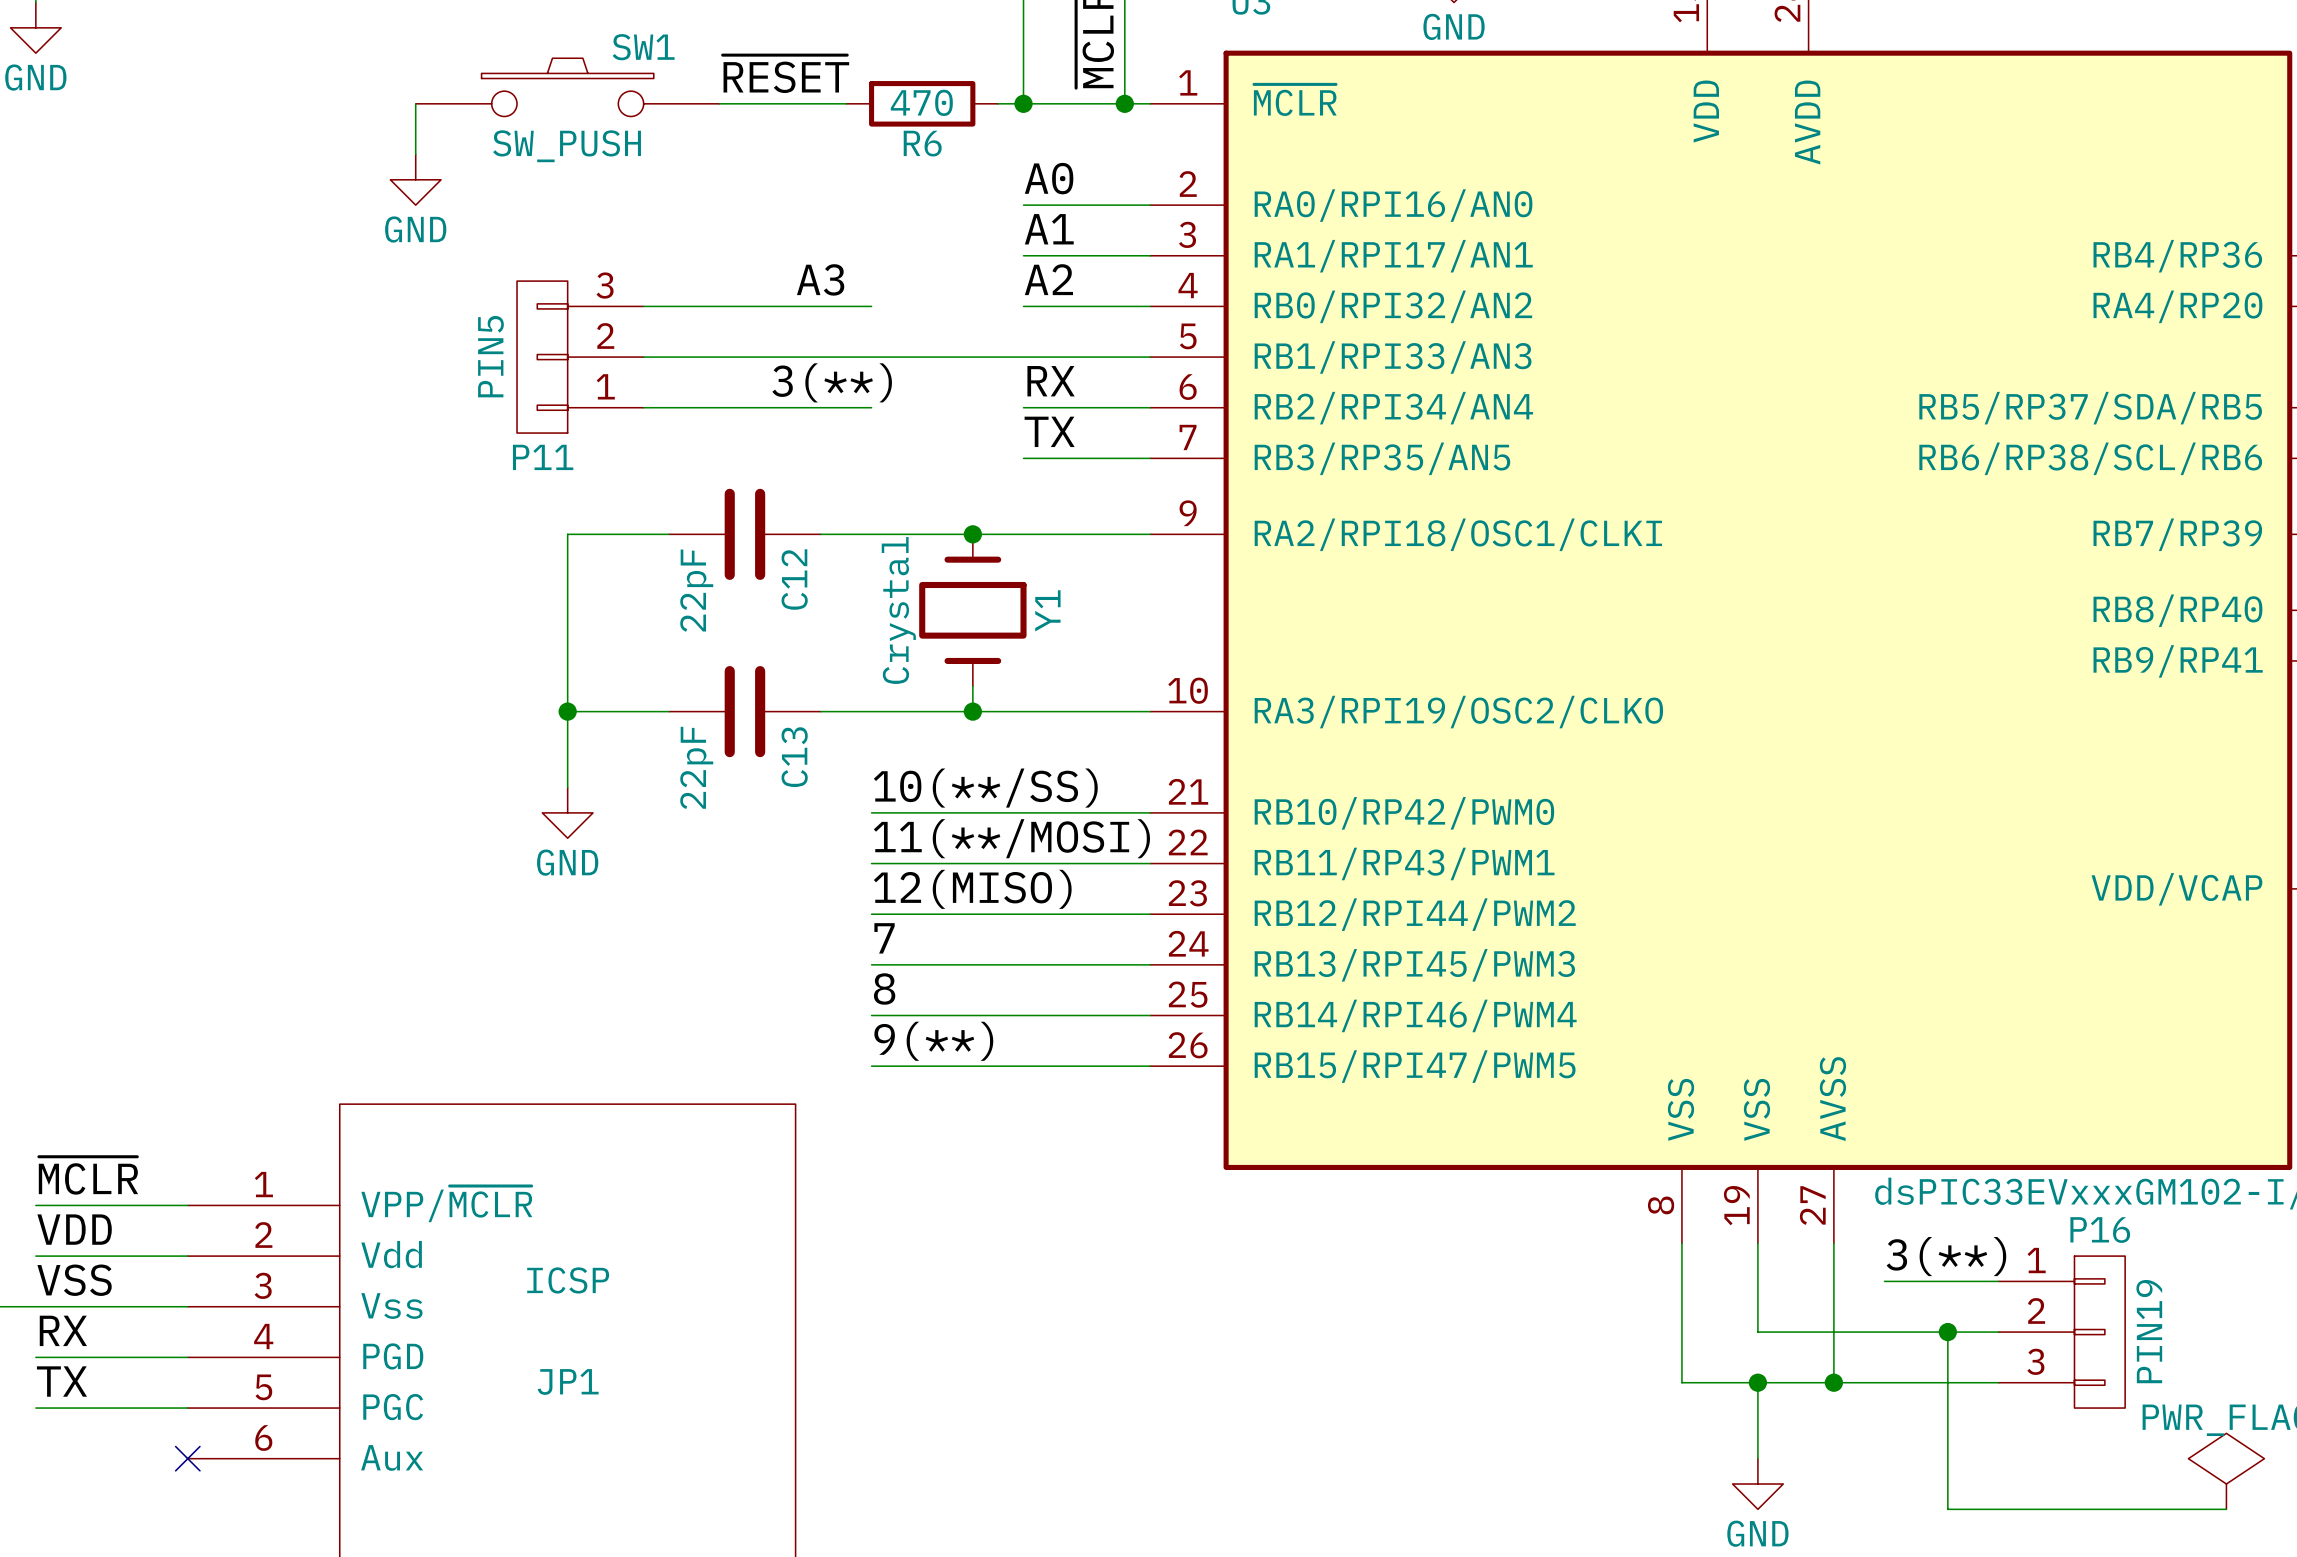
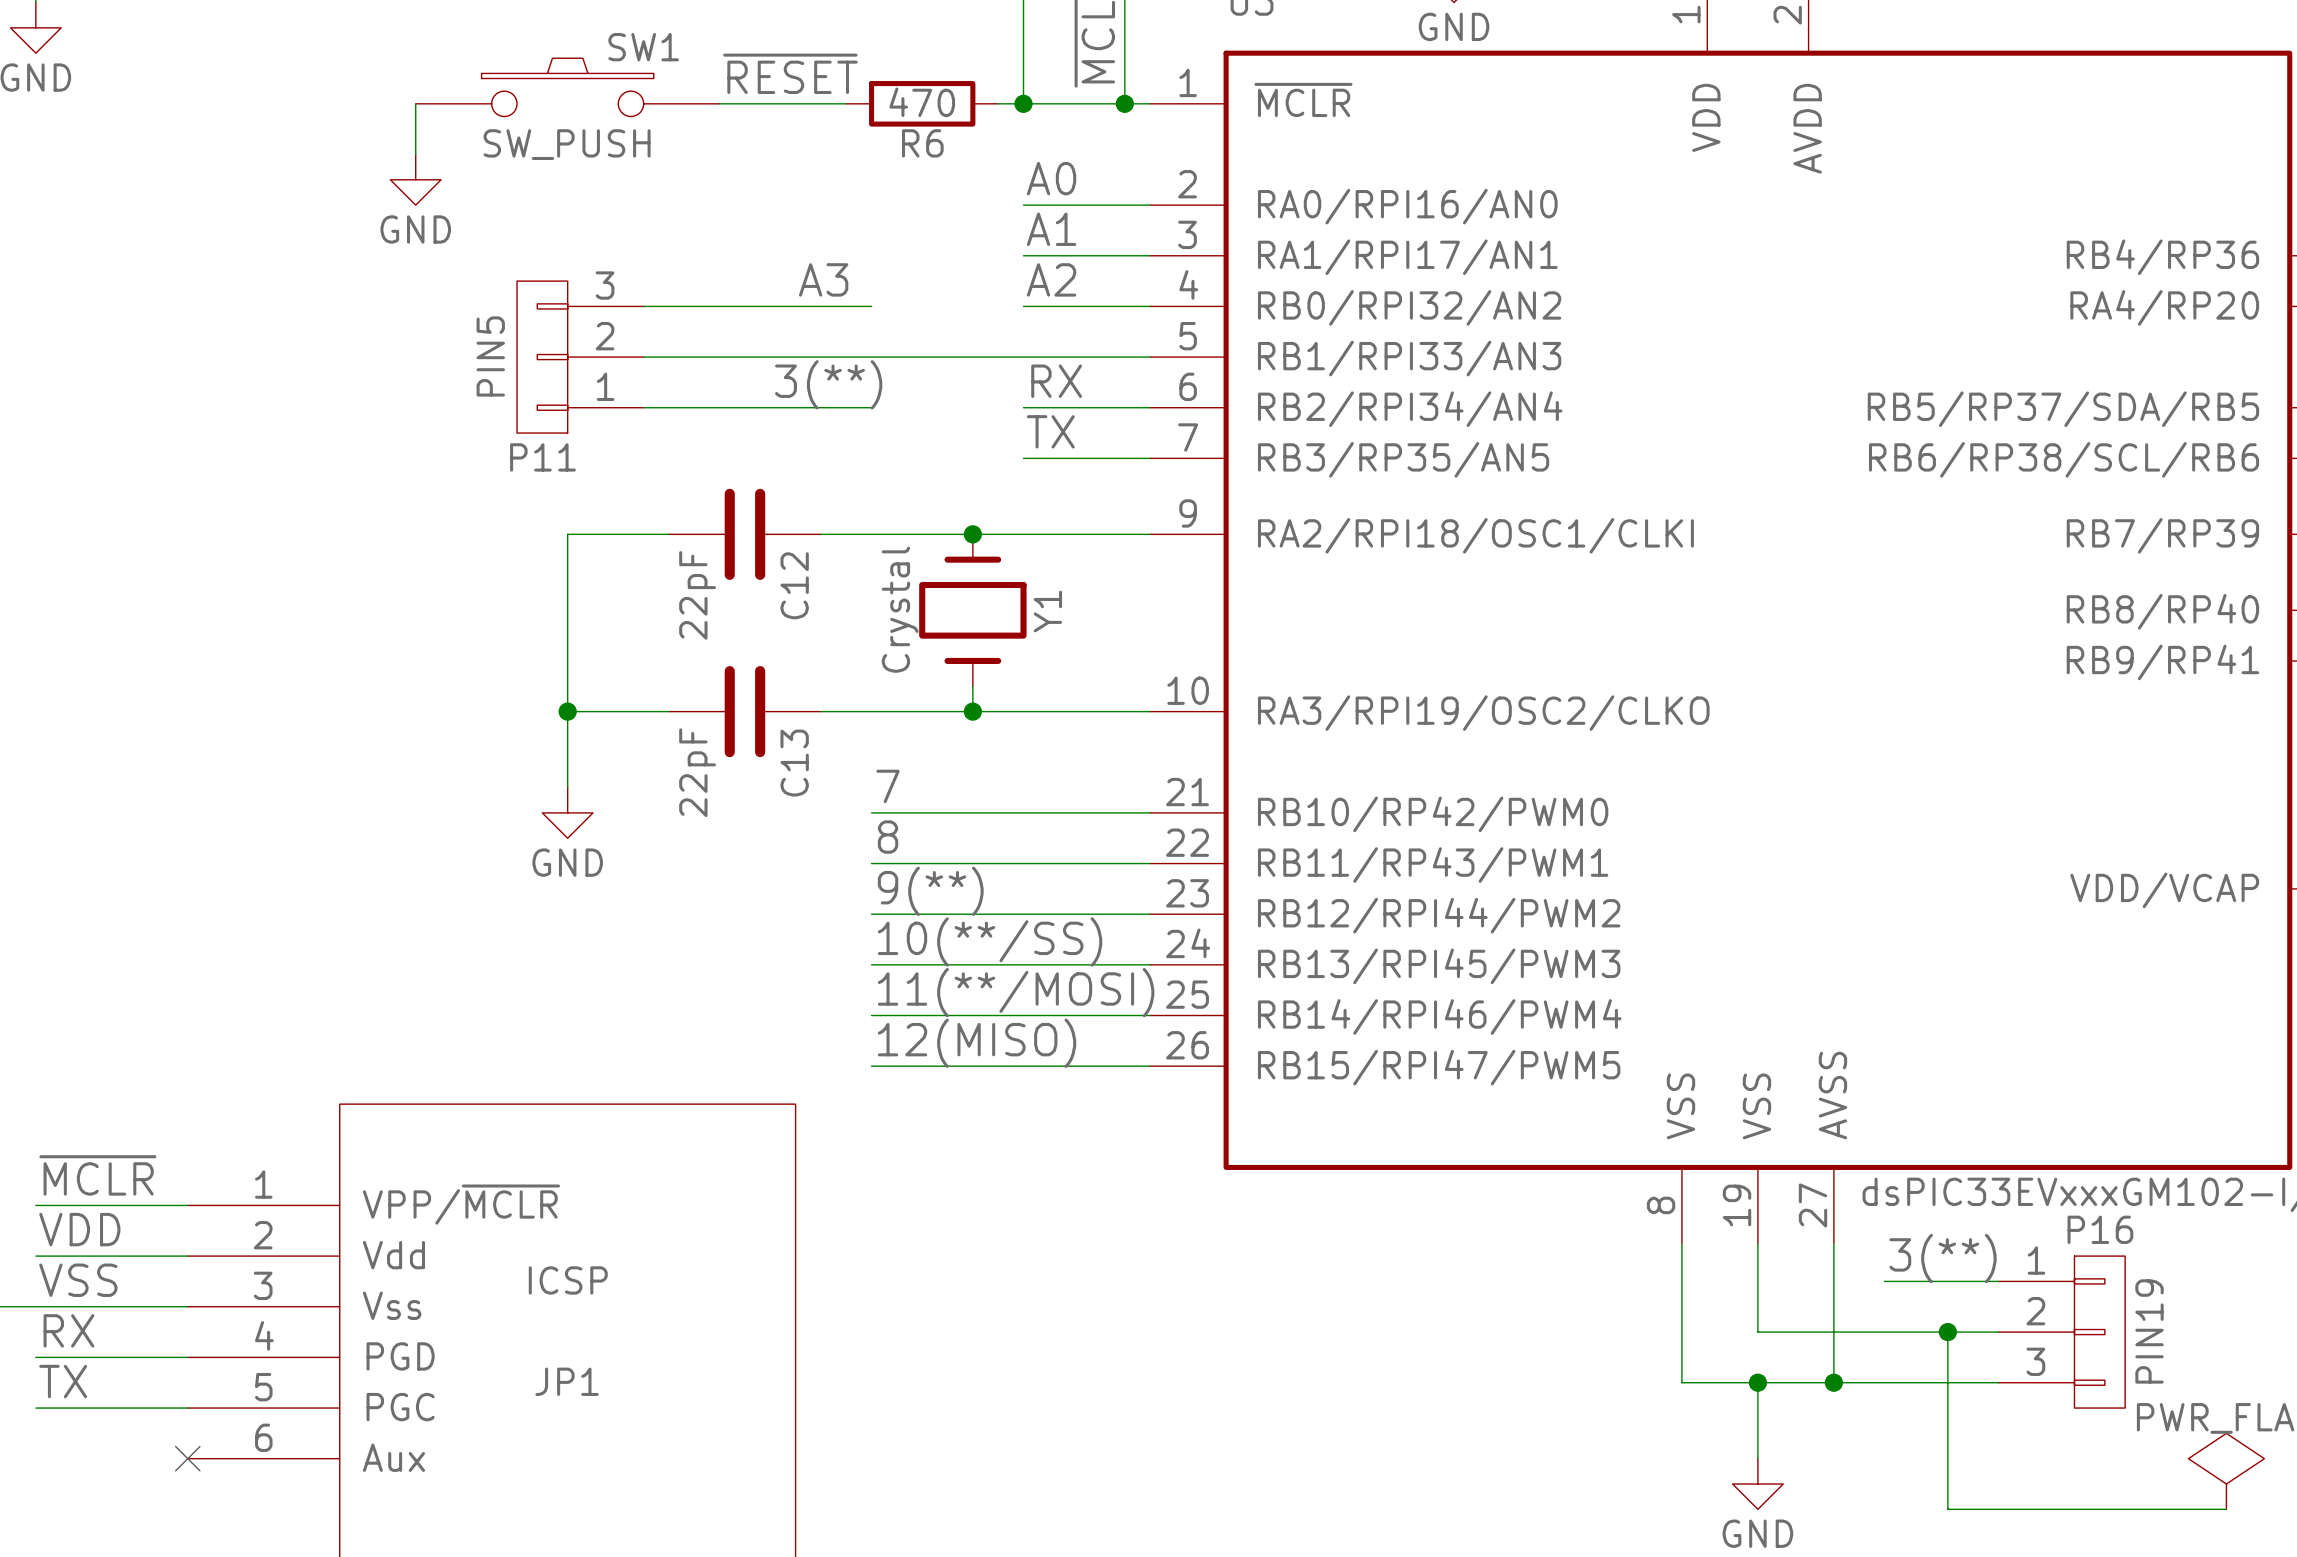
label: 10(**/SS) (985, 788) -> 7 (888, 786)
label: 11(**/MOSI) (1011, 838) -> 8 (888, 837)
label: 12(MISO) (972, 889) -> 9(**) (930, 891)
label: 7 (884, 938) -> 10(**/SS) (990, 941)
label: 8 (884, 989) -> 11(**/MOSI) (1016, 992)
label: 9(**) (933, 1041) -> 12(MISO) (977, 1043)

